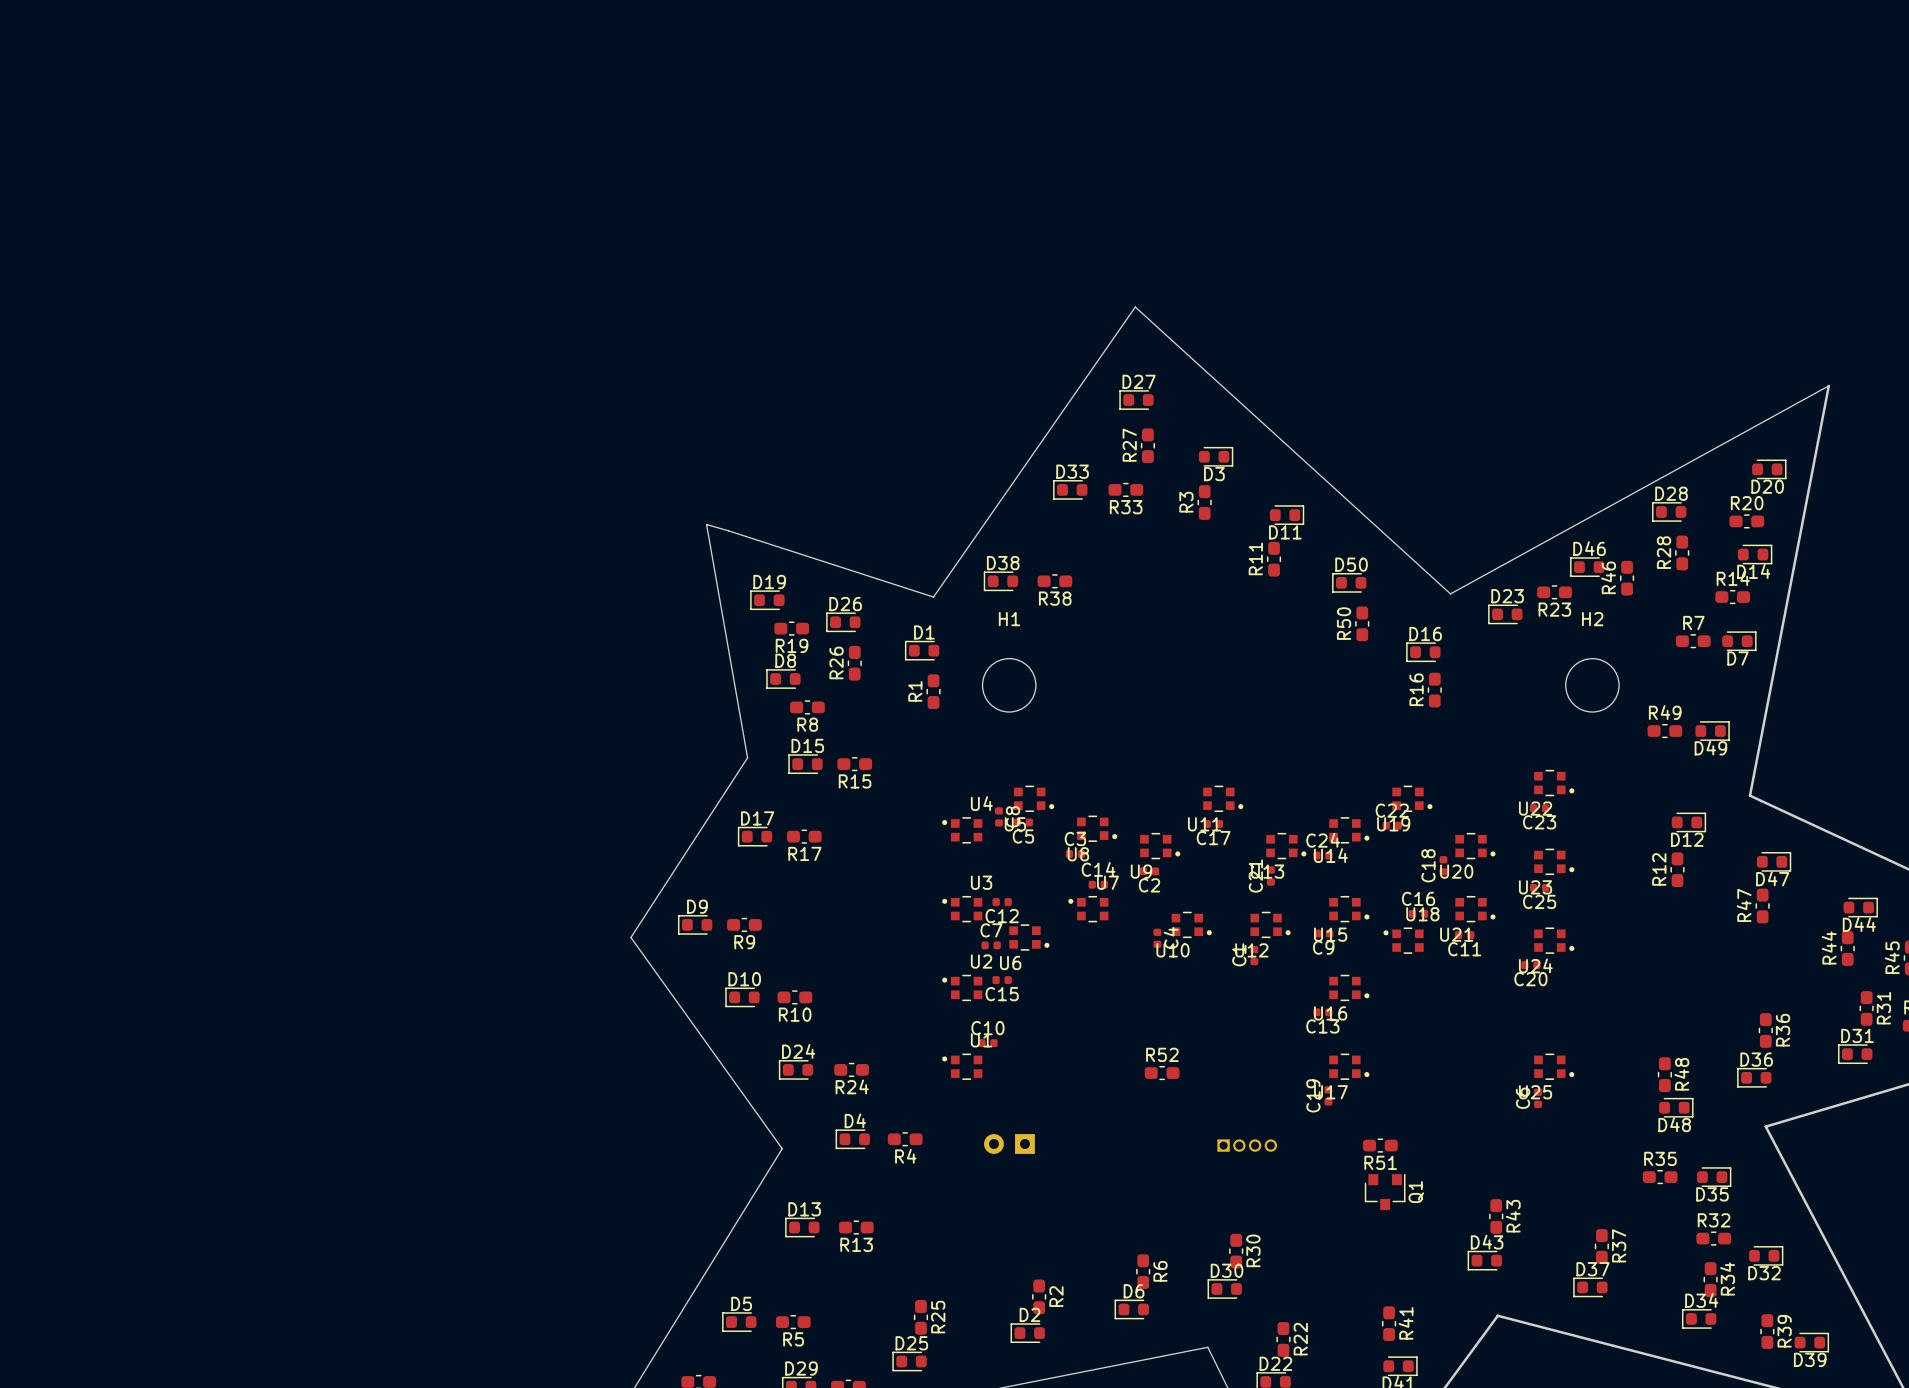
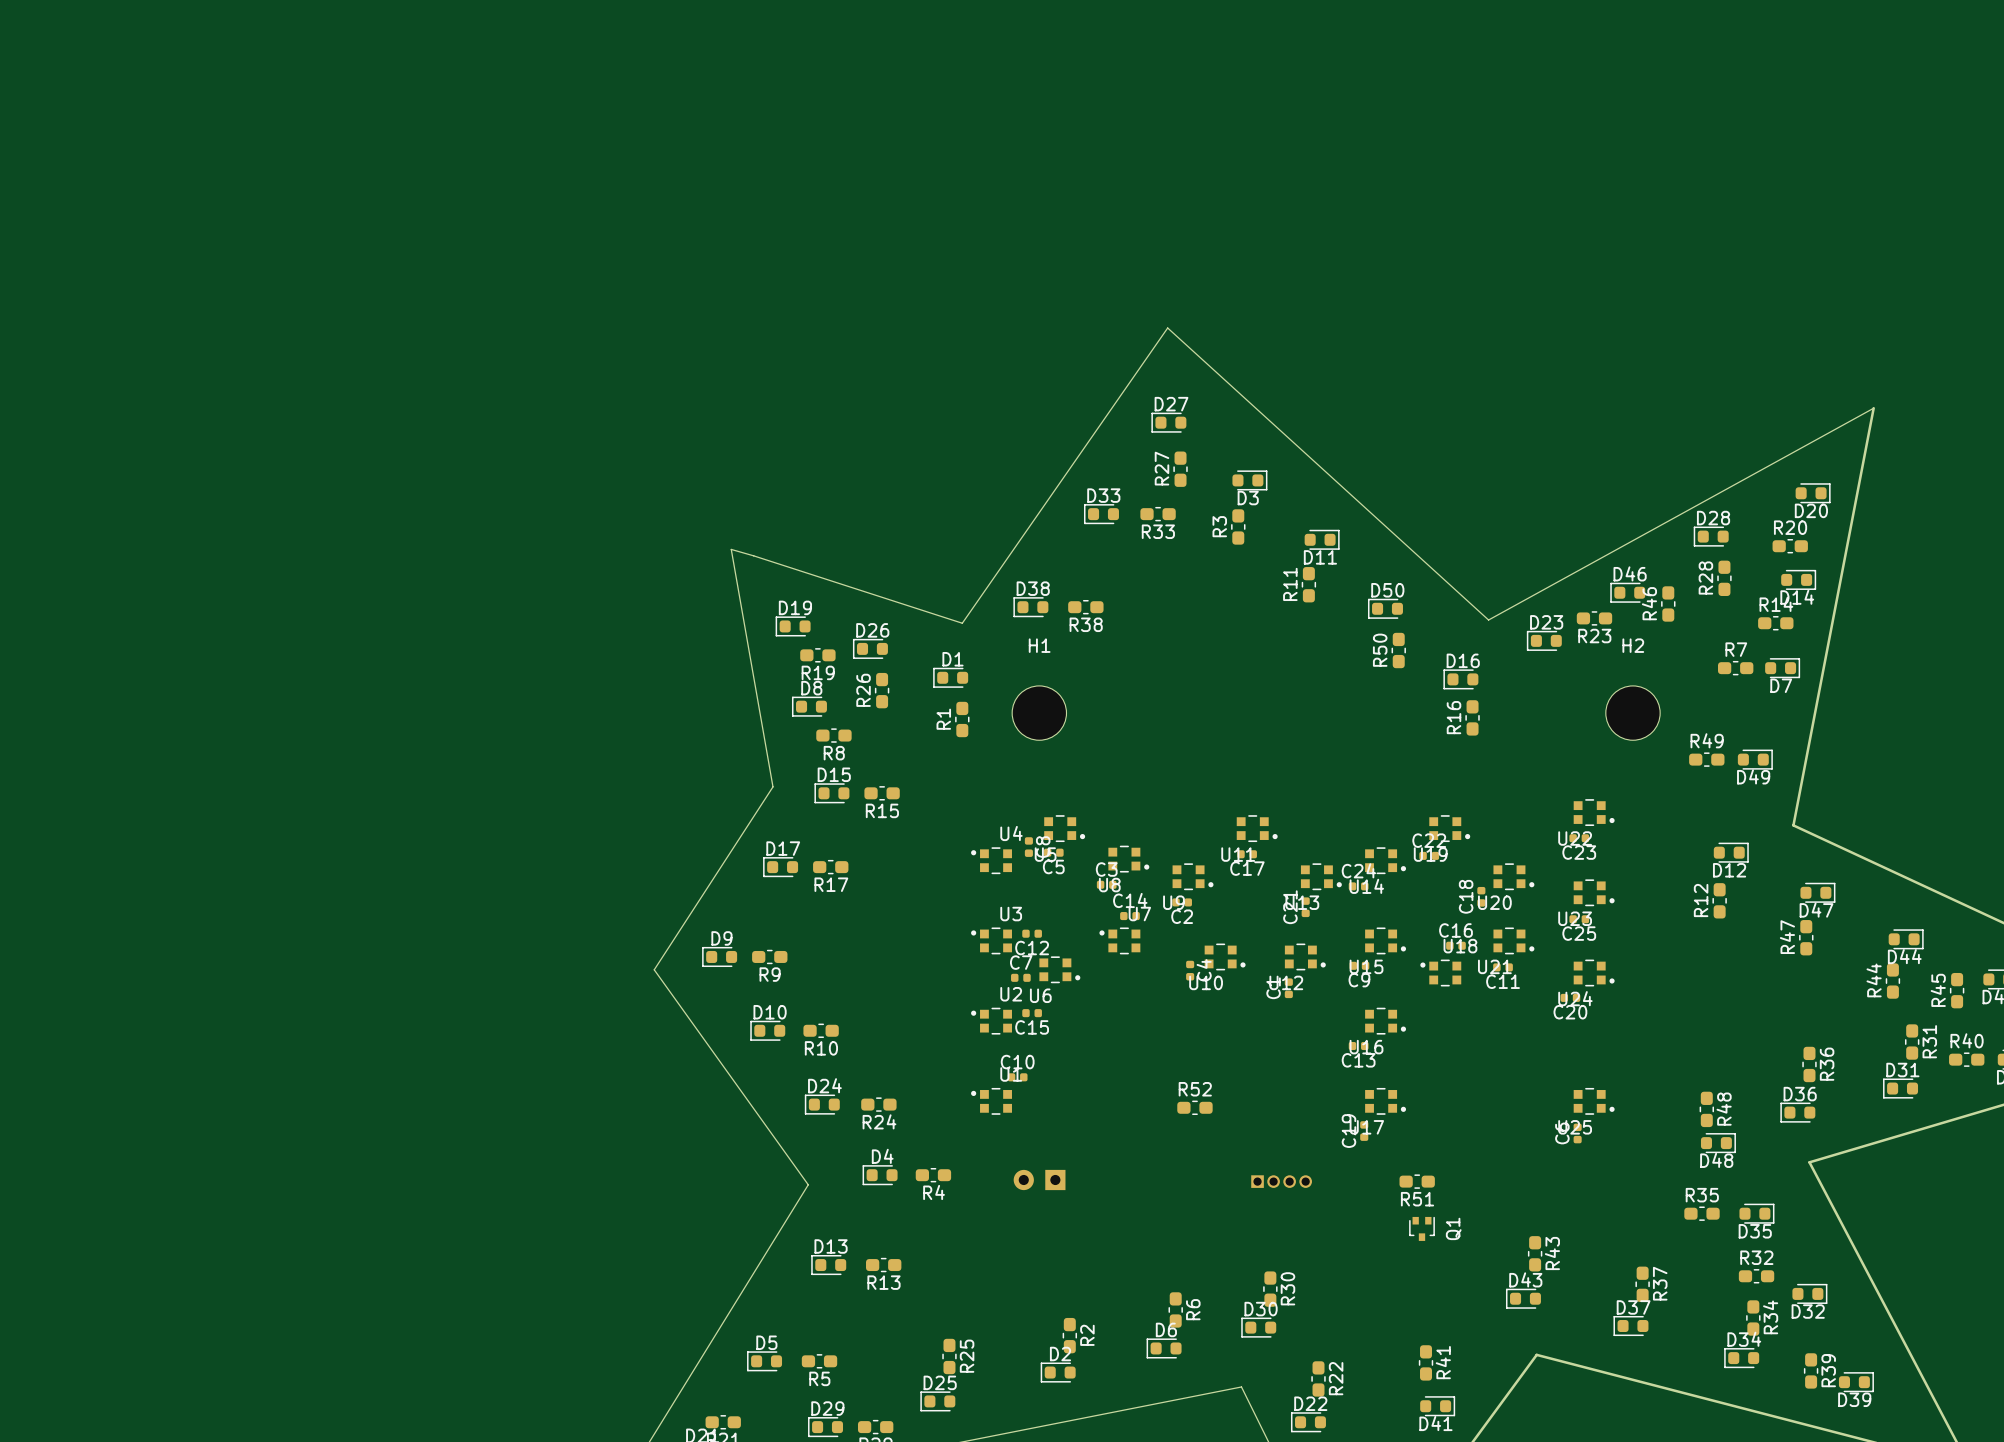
Q1 footprint: [1364, 1173, 1406, 1211] -> [1409, 1216, 1435, 1241]

